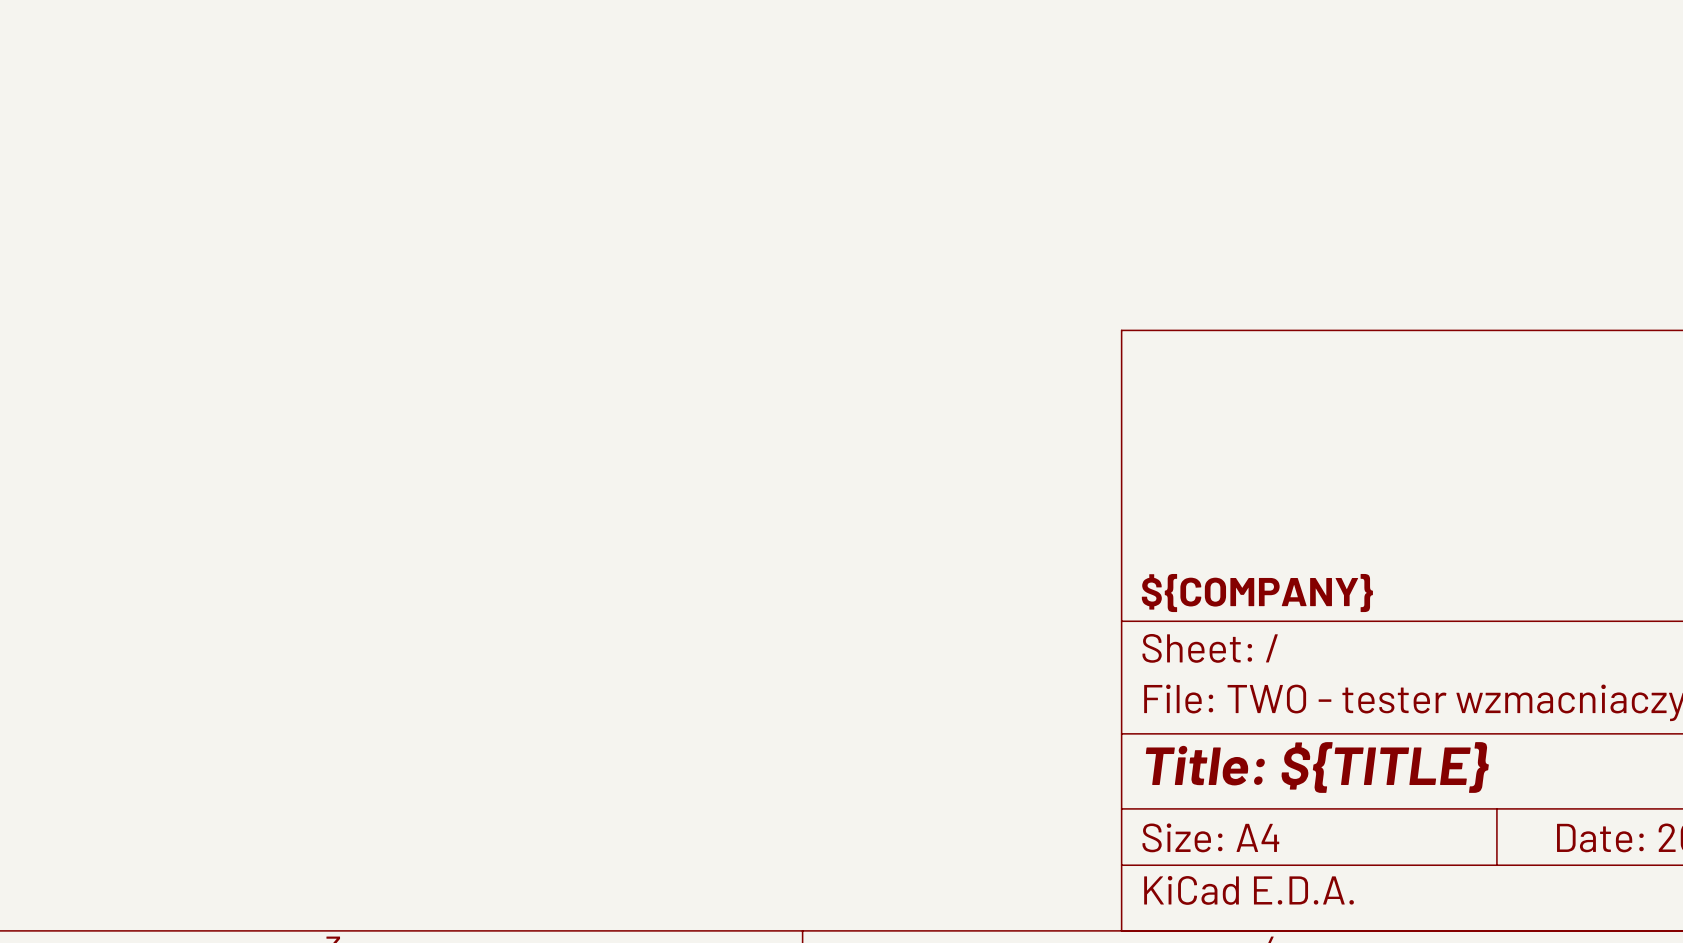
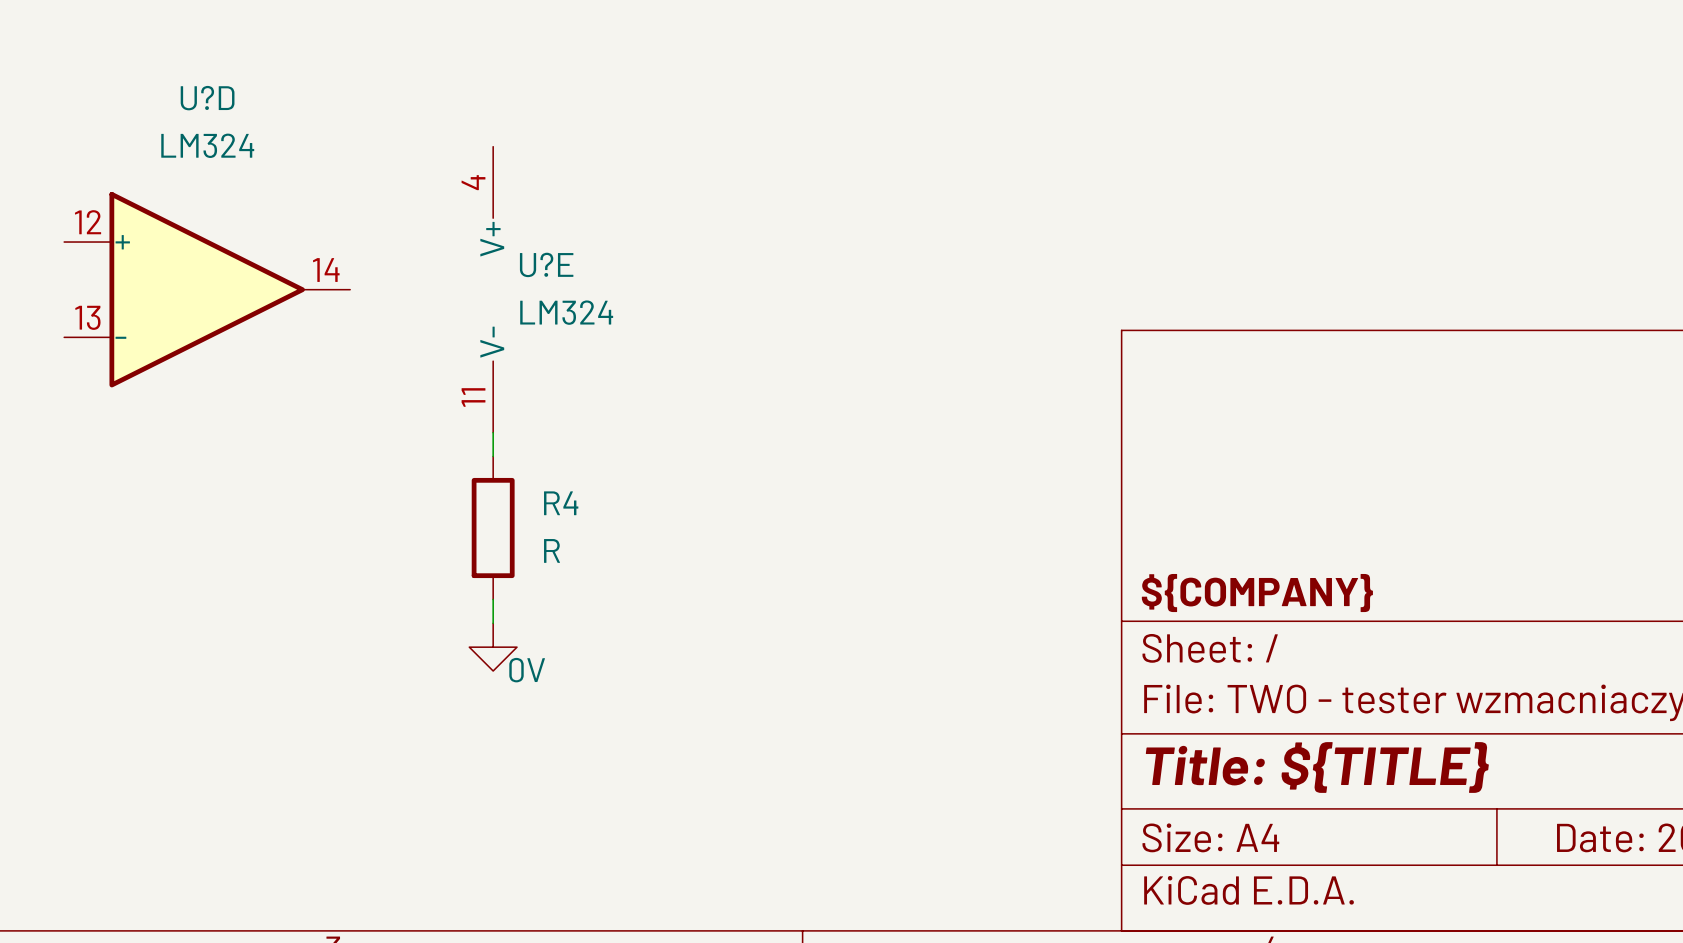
U?D: none -> LM324 (207, 289)
U?E: none -> LM324 (493, 289)
wire: none -> (493, 432) (493, 456)
R4: none -> R (493, 528)
wire: none -> (493, 599) (493, 623)
power symbol: none -> 0V (493, 647)

